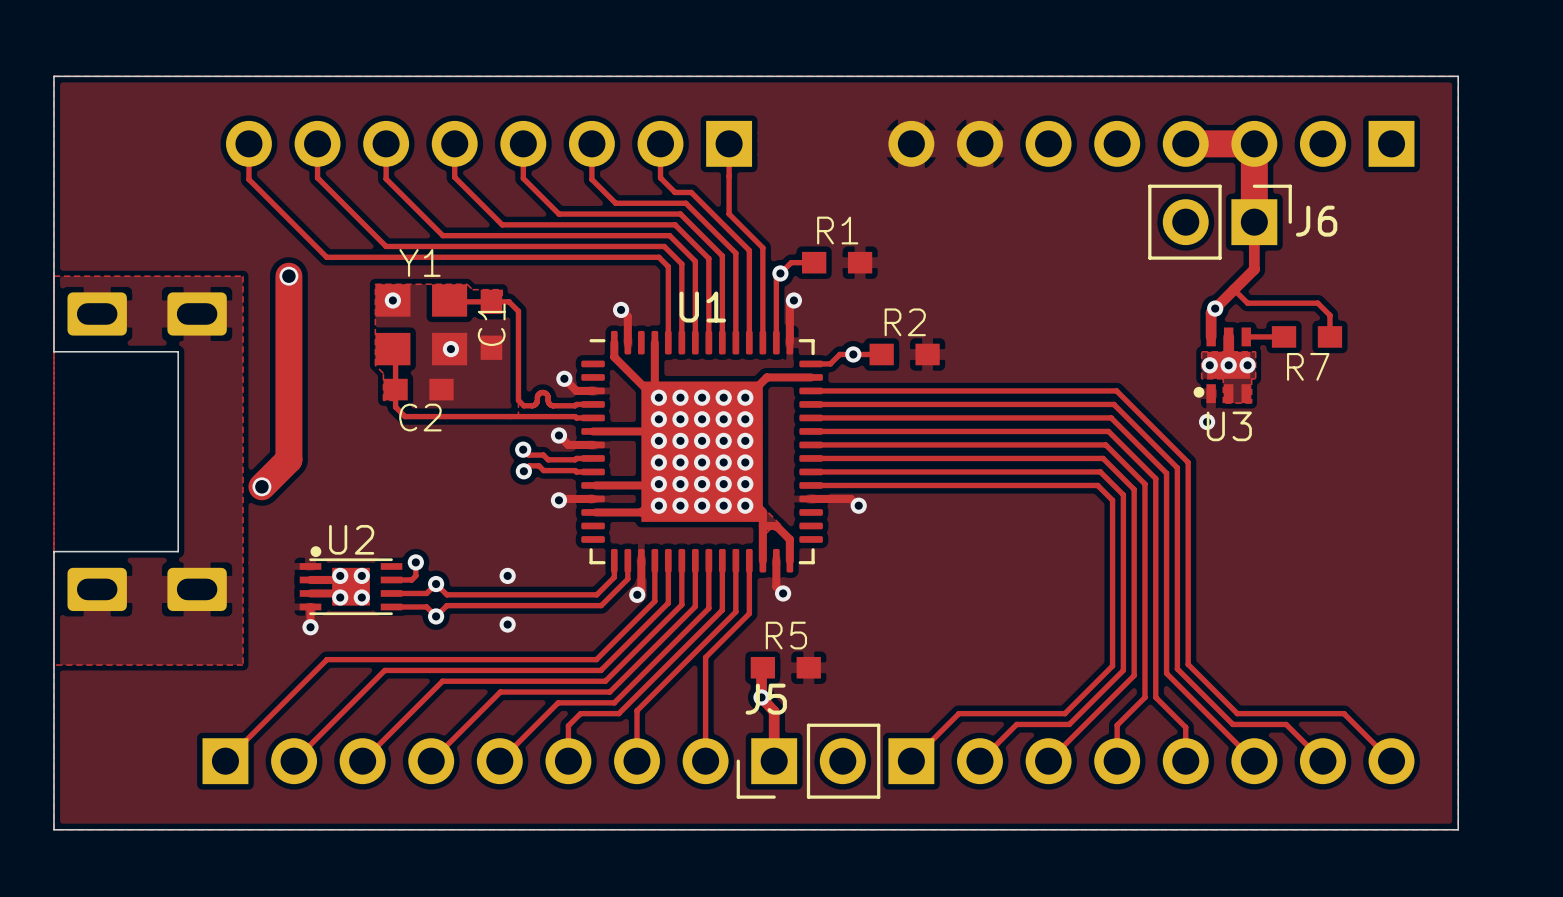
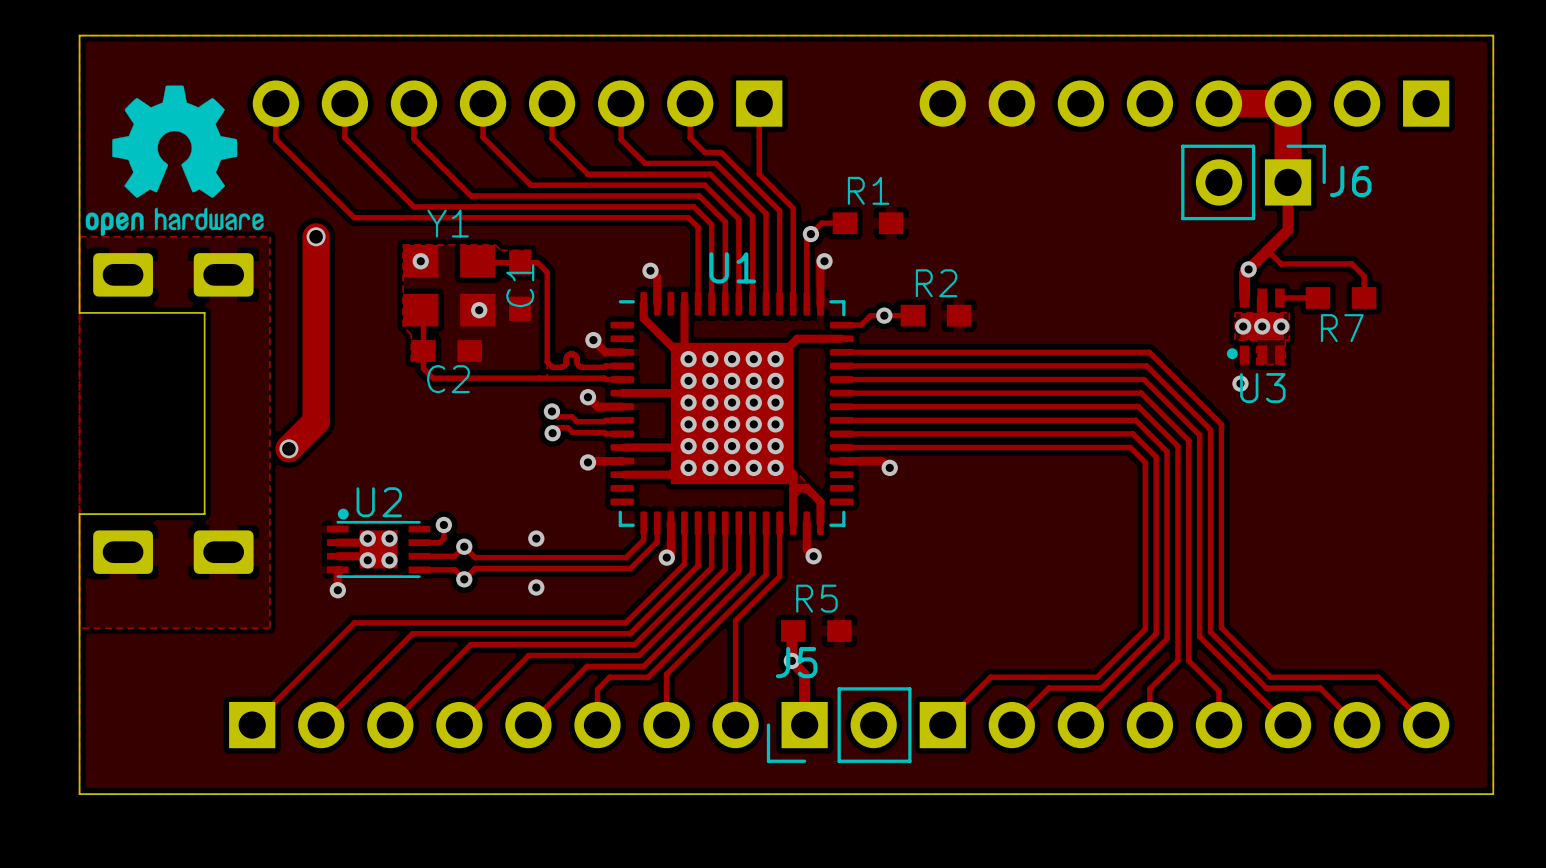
drawing: none -> [85, 85, 264, 237]

